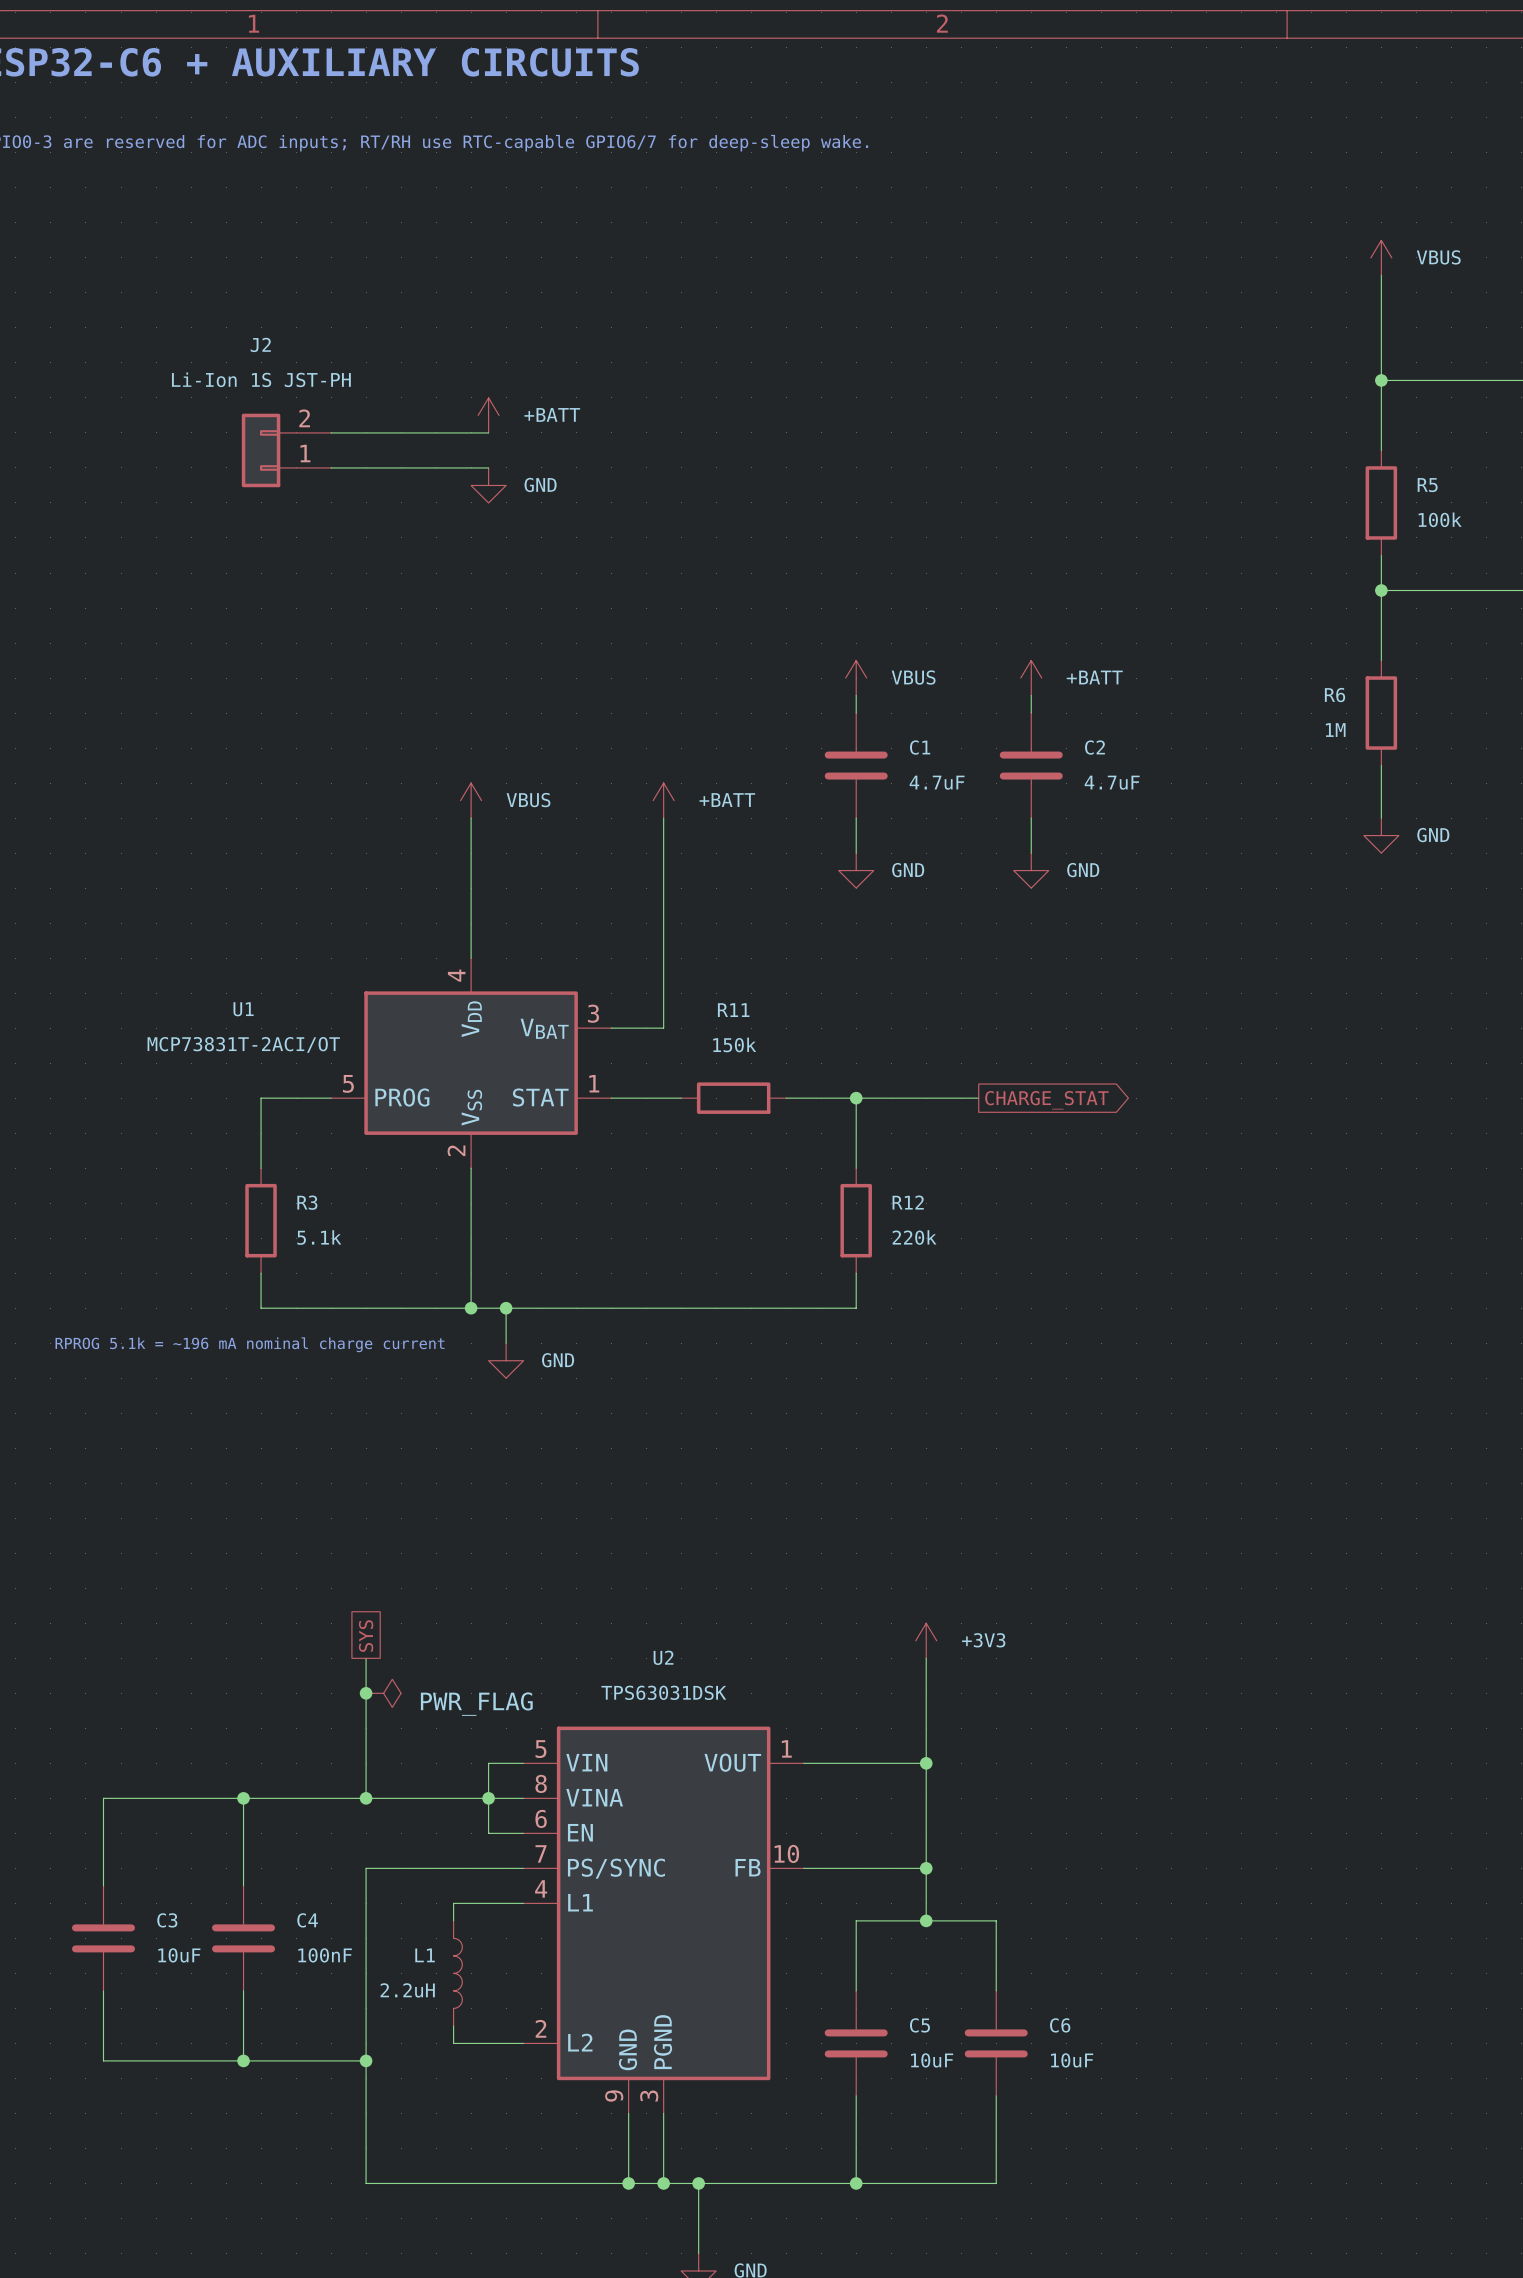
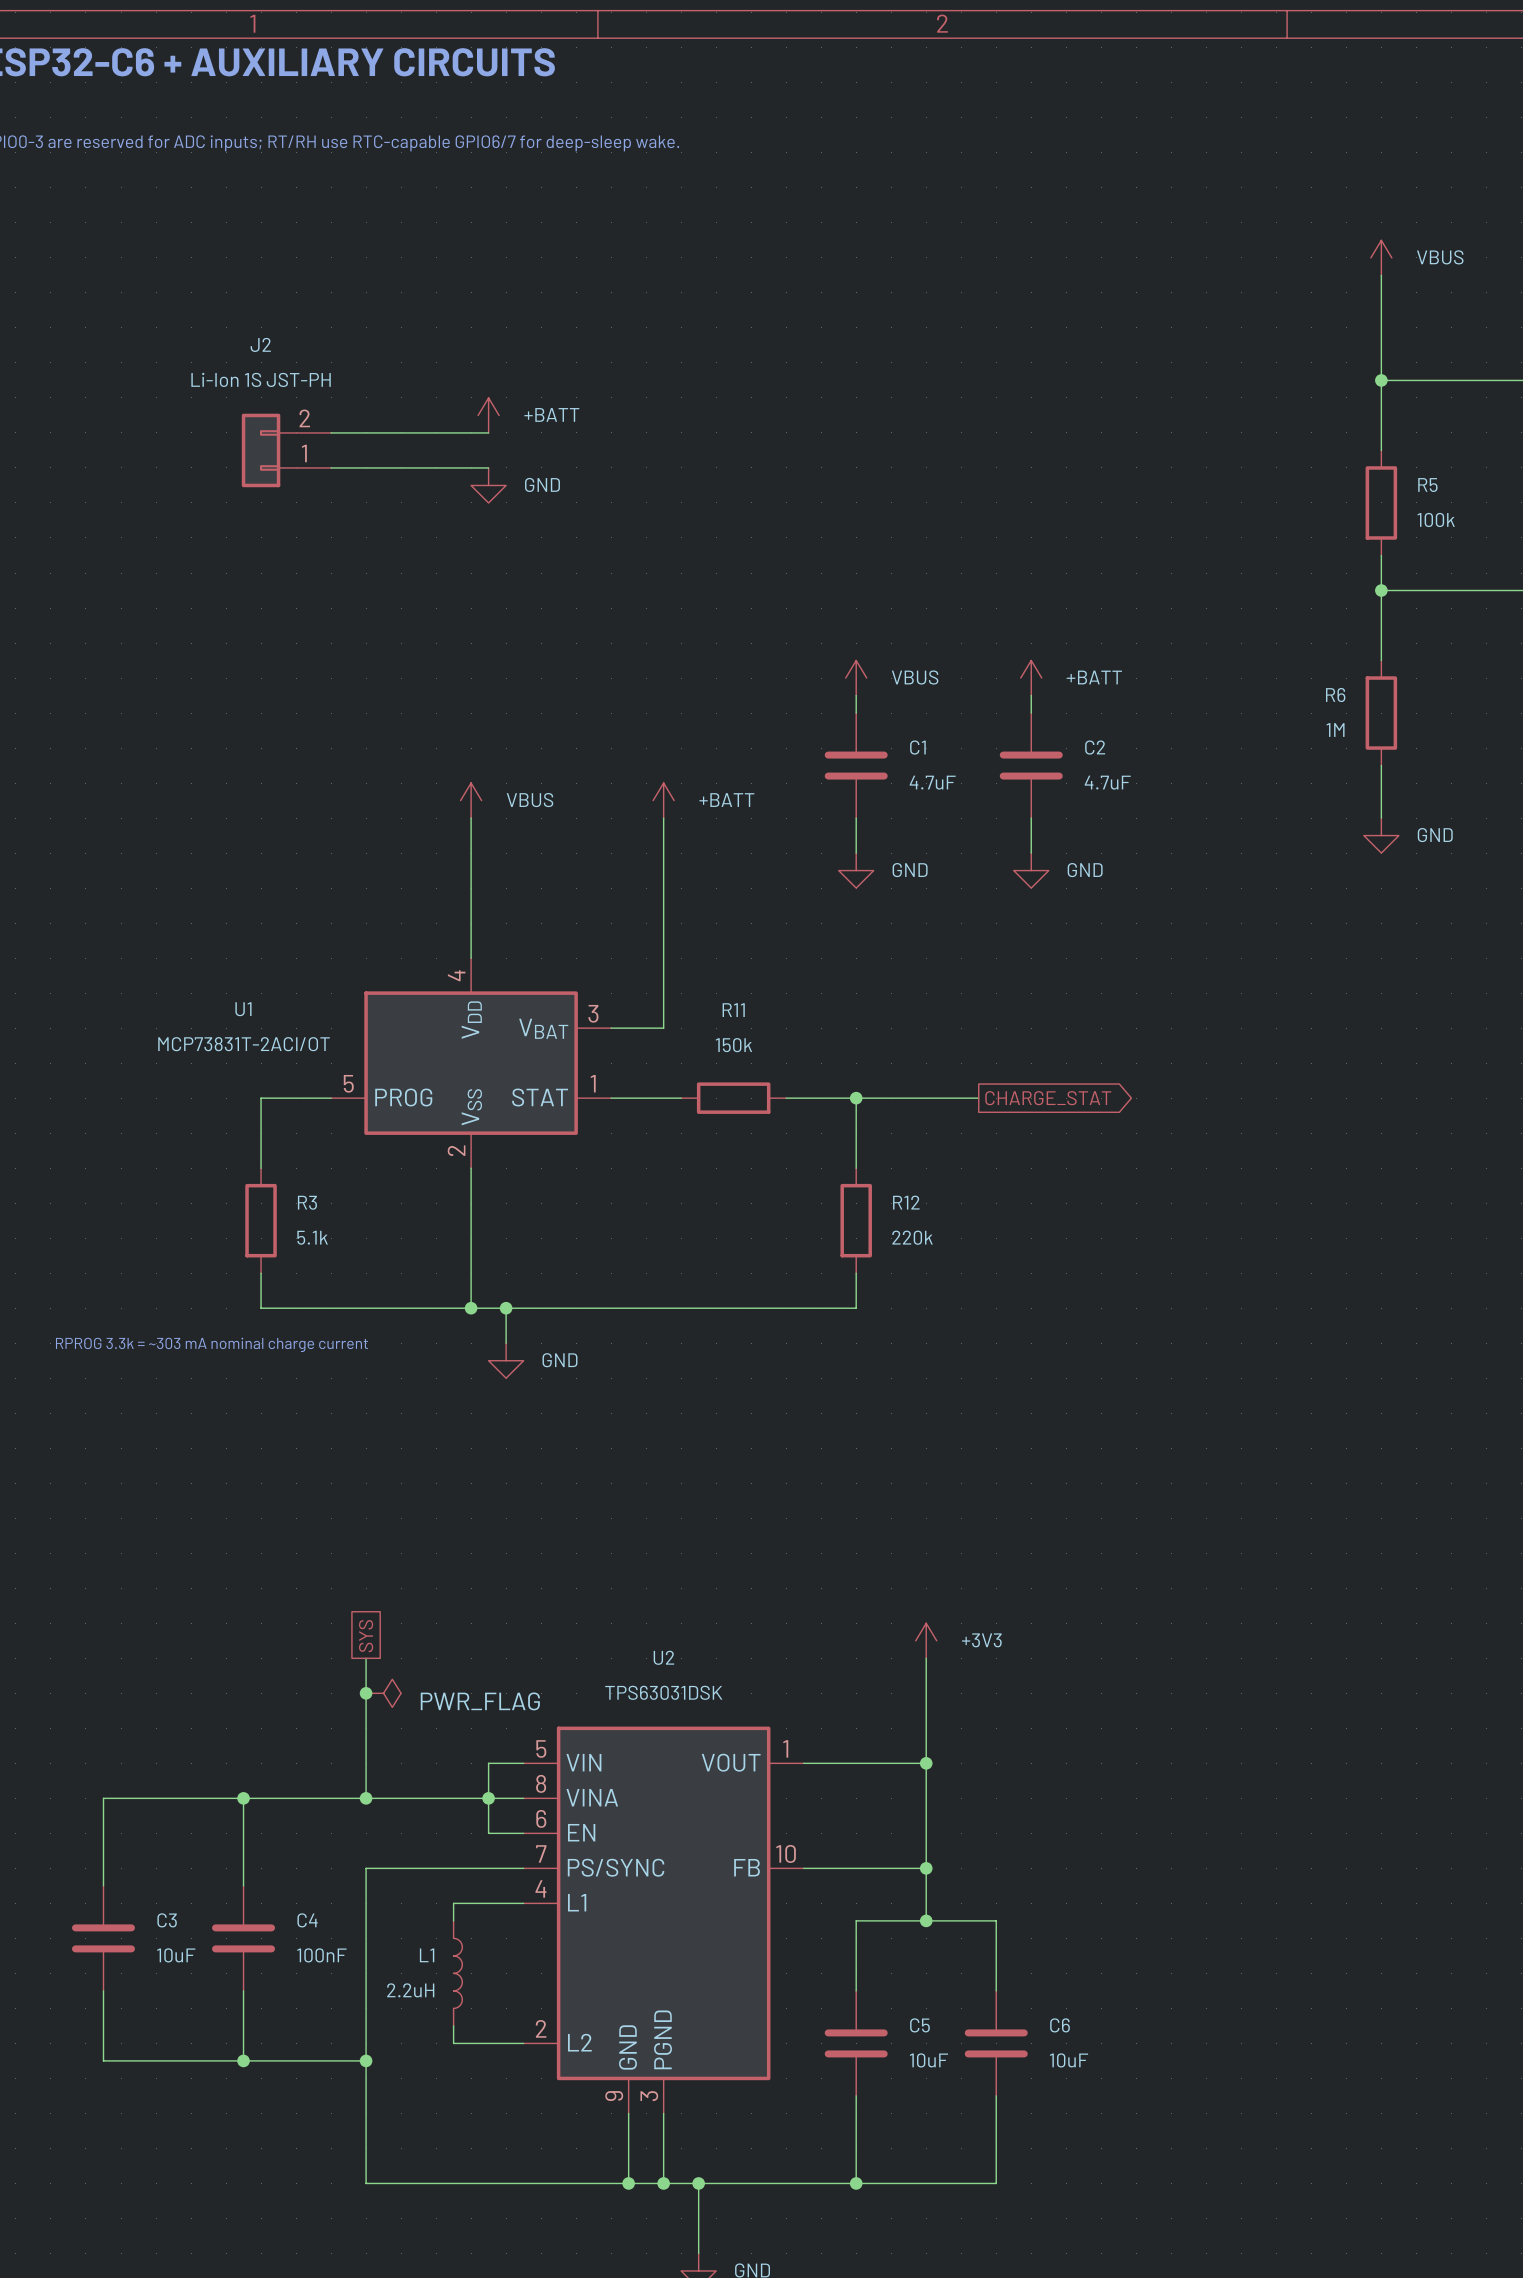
text: RPROG 5.1k = ~196 mA nominal charge current (250, 1344) -> RPROG 3.3k = ~303 mA nominal charge current (211, 1344)

